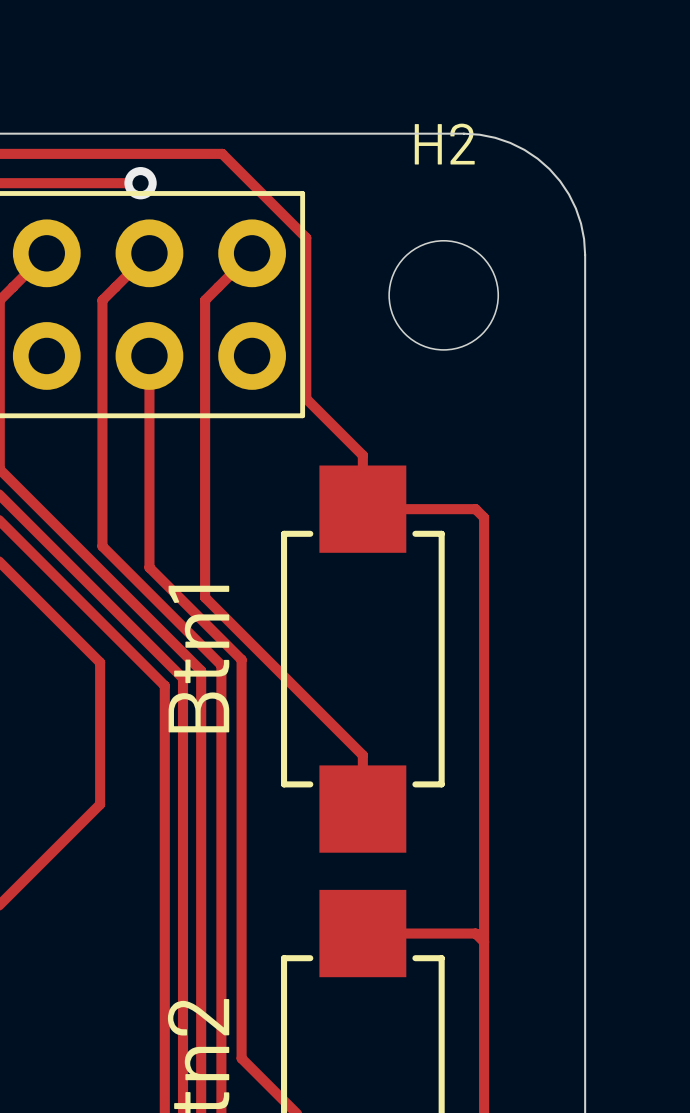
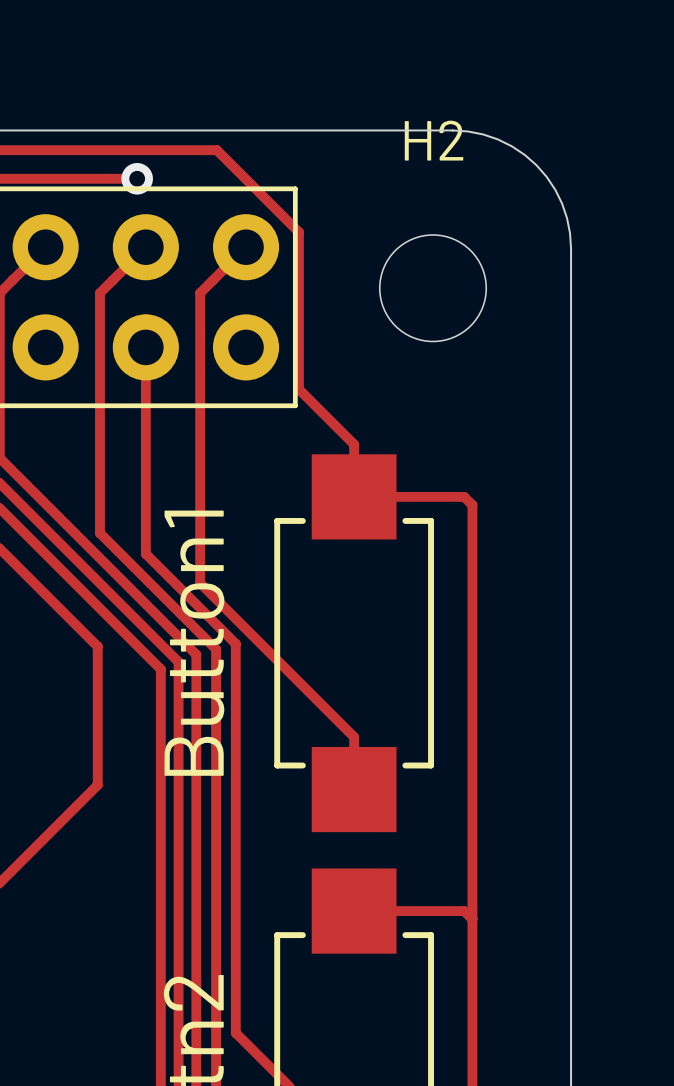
Btn1 name: Btn1 (198, 659) -> Button1 (194, 643)

